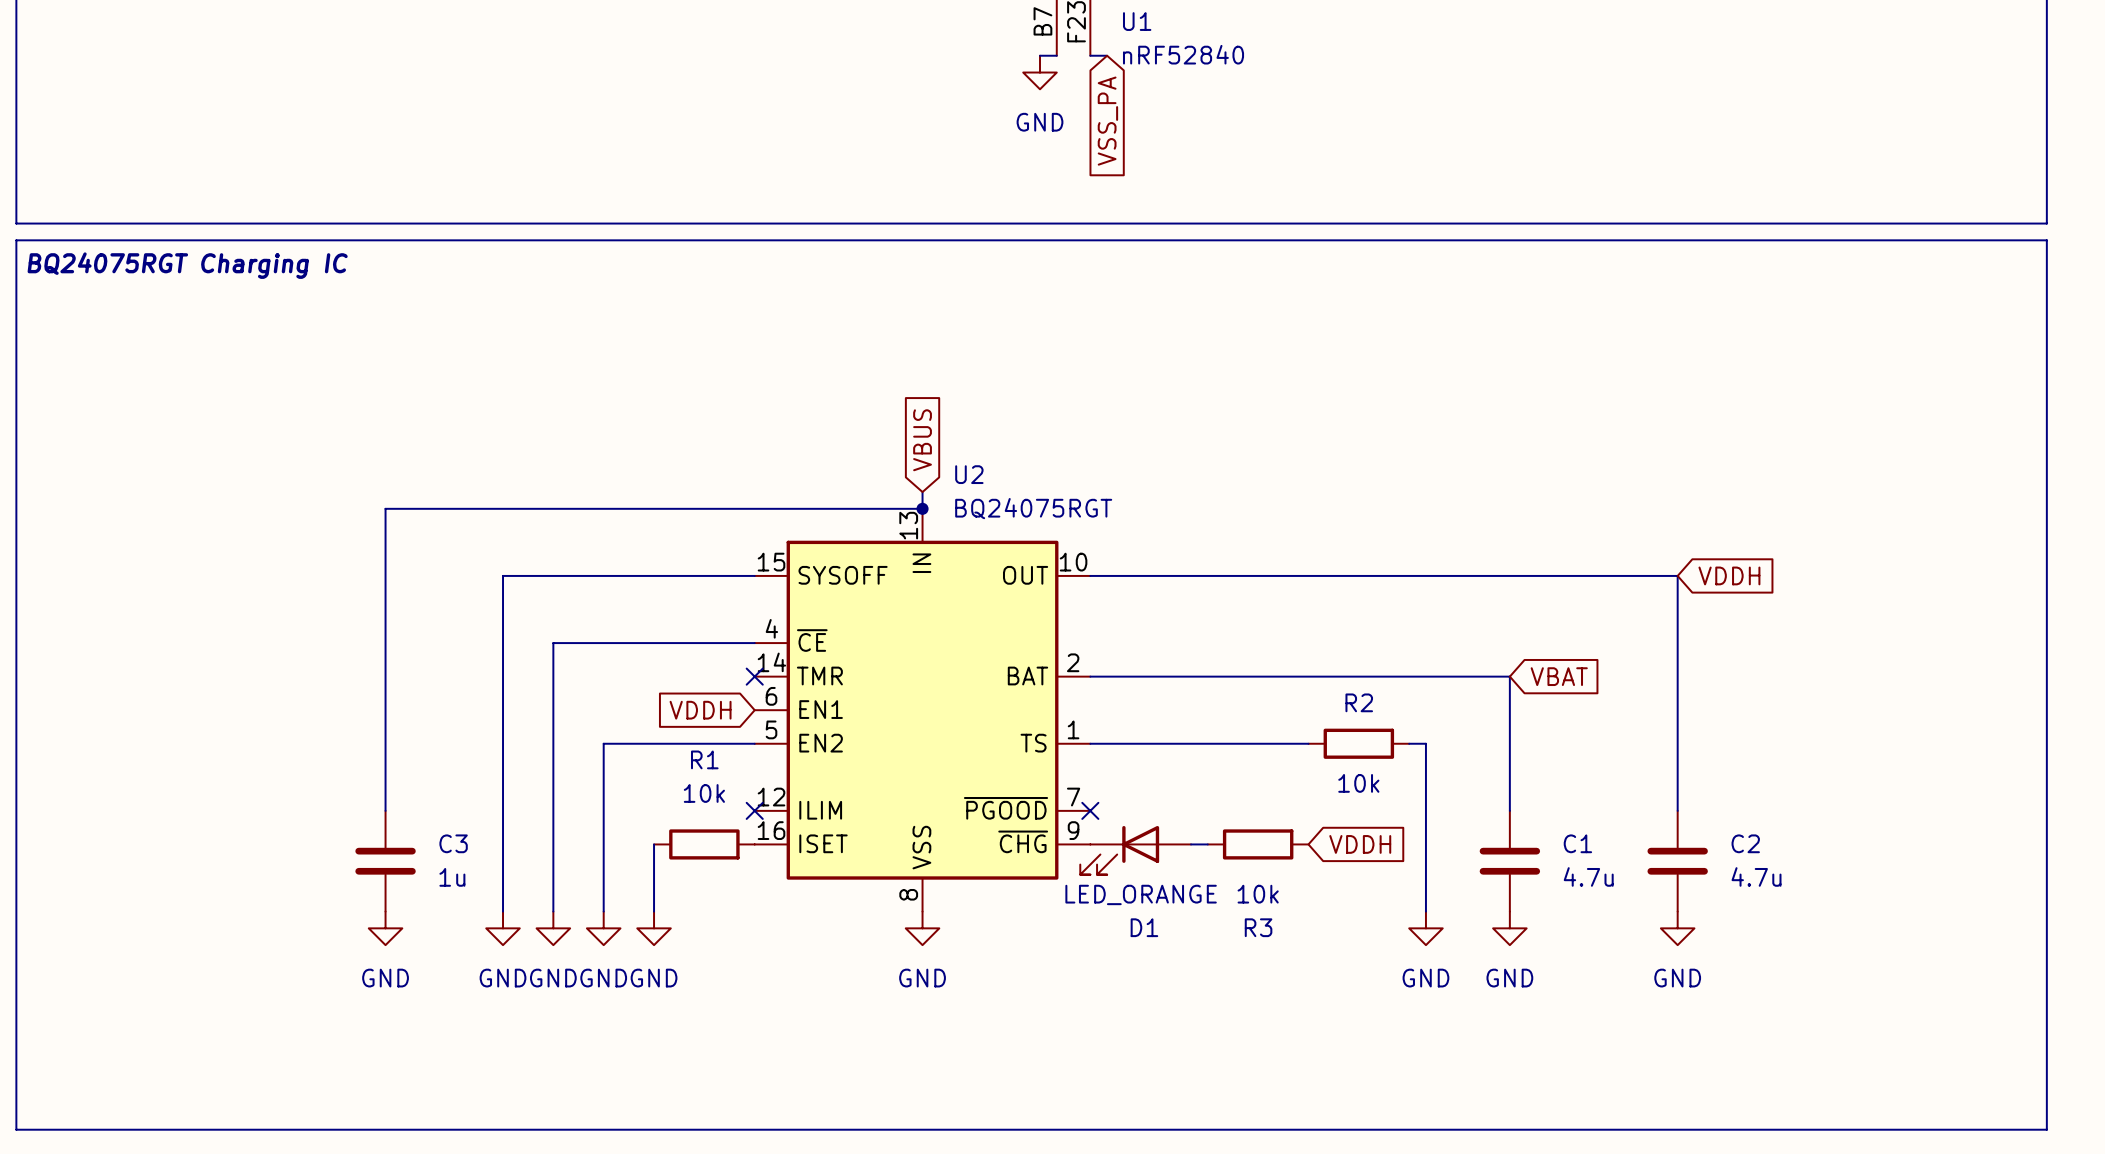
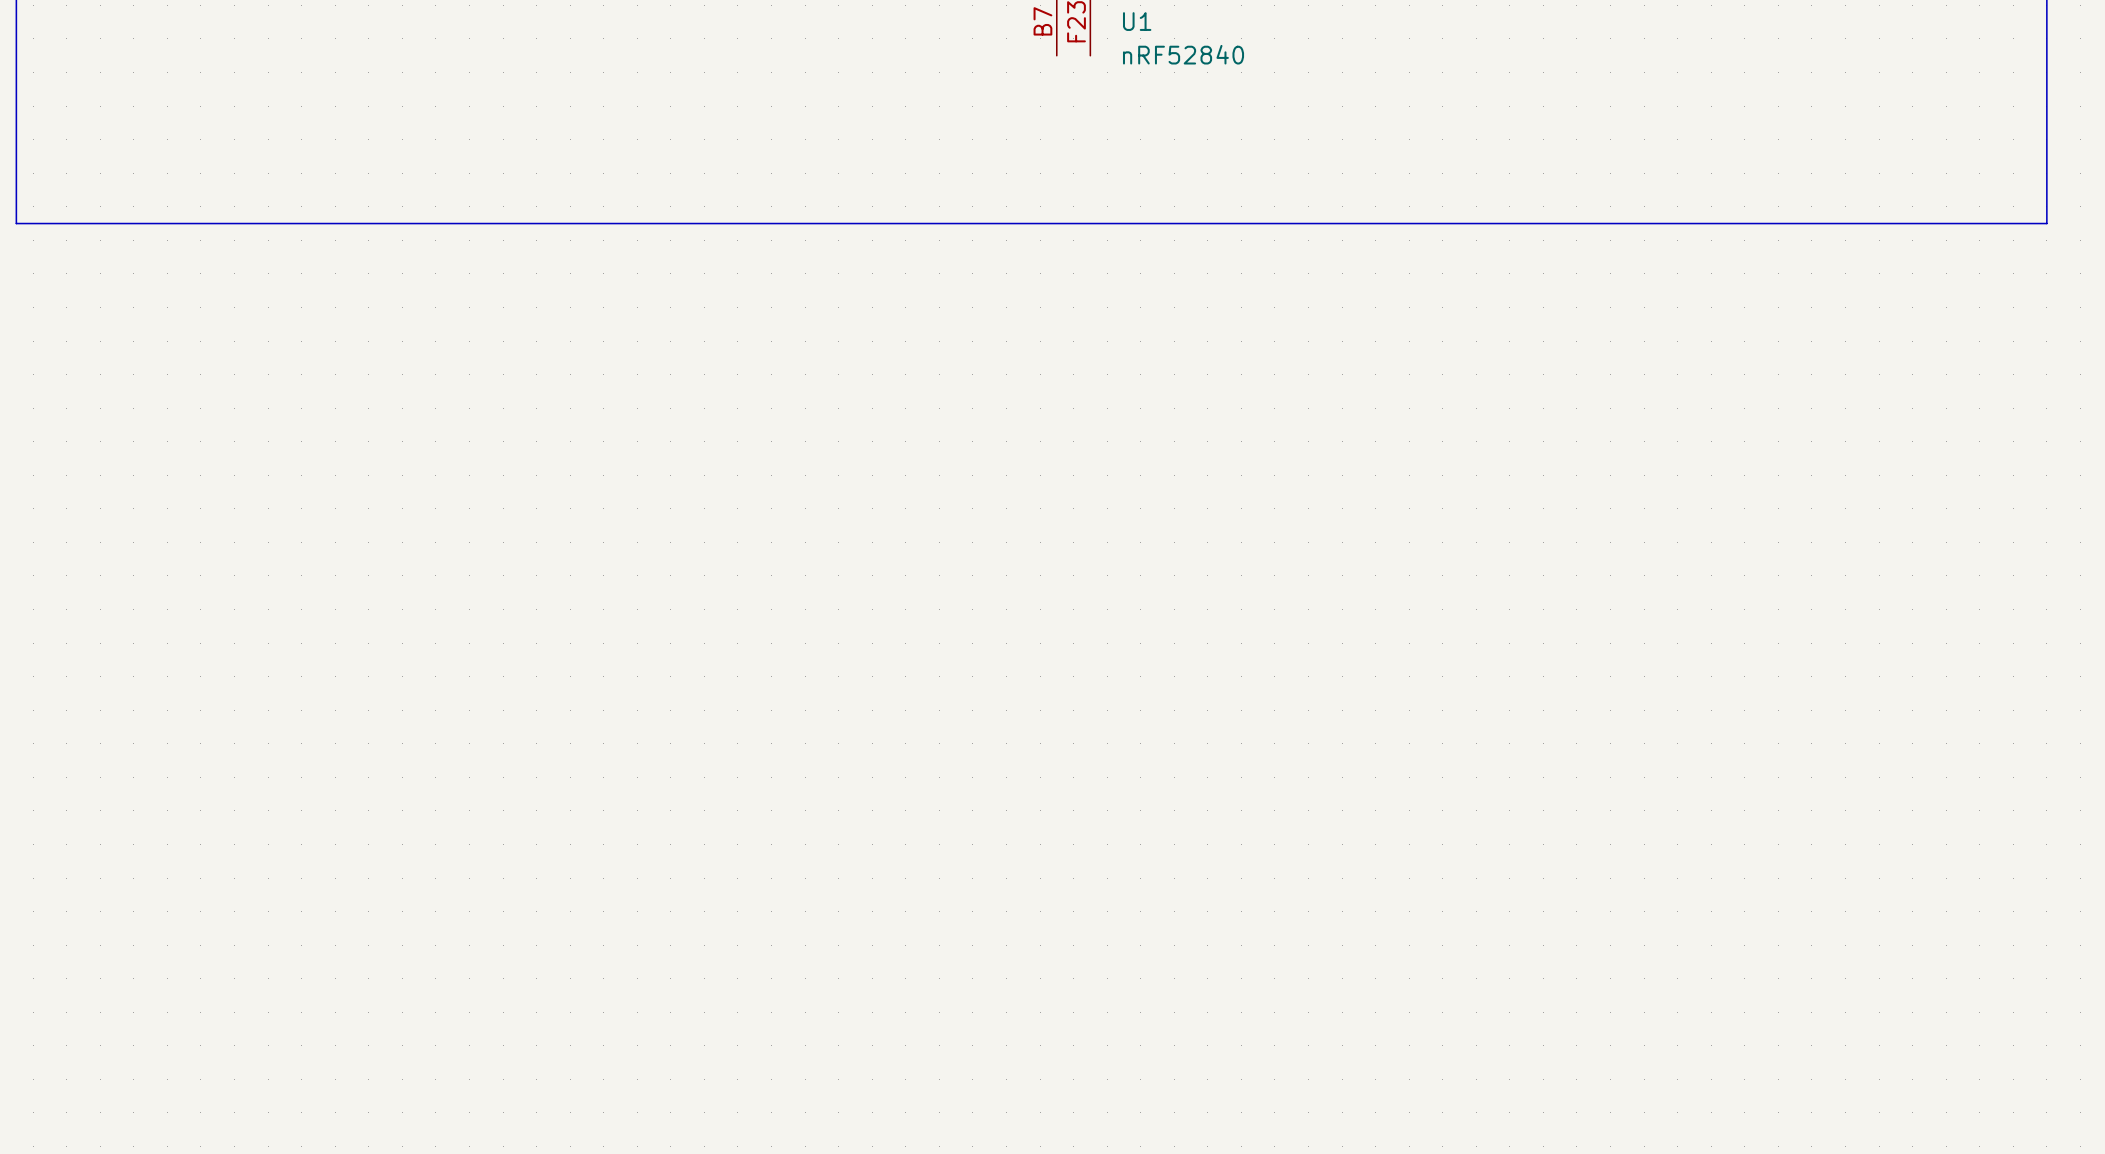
wire: (1040, 55) (1056, 55) -> none
wire: (1090, 55) (1107, 55) -> none
power symbol: GND (1040, 72) -> none
global label: VSS_PA (1107, 121) -> none
line: (16, 240) (16, 1129) (2046, 1129) (2046, 240) (16, 240) -> none
text: BQ24075RGT Charging IC (187, 265) -> none
global label: VBUS (922, 440) -> none
wire: (922, 492) (922, 508) (385, 508) (385, 810) -> none
junction: (922, 508) -> none
wire: (754, 575) (503, 575) (503, 911) -> none
wire: (1090, 575) (1677, 575) (1677, 810) -> none
global label: VDDH (1729, 575) -> none
wire: (754, 643) (553, 643) (553, 911) -> none
no-connect mark: (754, 676) -> none
wire: (1090, 676) (1509, 676) (1509, 810) -> none
global label: VBAT (1559, 676) -> none
global label: VDDH (700, 710) -> none
U2: BQ24075RGT (922, 710) -> none
wire: (754, 743) (603, 743) (603, 911) -> none
wire: (1090, 743) (1308, 743) -> none
R2: 10k (1358, 743) -> none
wire: (1409, 743) (1425, 743) (1425, 911) -> none
no-connect mark: (754, 810) -> none
no-connect mark: (1090, 810) -> none
wire: (654, 844) (654, 911) -> none
R1: 10k (704, 844) -> none
wire: (1191, 844) (1207, 844) -> none
R3: 10k (1258, 844) -> none
global label: VDDH (1360, 844) -> none
D1: LED_ORANGE (1135, 850) -> none
C3: 1u (385, 861) -> none
C1: 4.7u (1509, 861) -> none
C2: 4.7u (1677, 861) -> none
power symbol: GND (385, 928) -> none
power symbol: GND (503, 928) -> none
power symbol: GND (553, 928) -> none
power symbol: GND (603, 928) -> none
power symbol: GND (654, 928) -> none
power symbol: GND (922, 928) -> none
power symbol: GND (1425, 928) -> none
power symbol: GND (1509, 928) -> none
power symbol: GND (1677, 928) -> none

